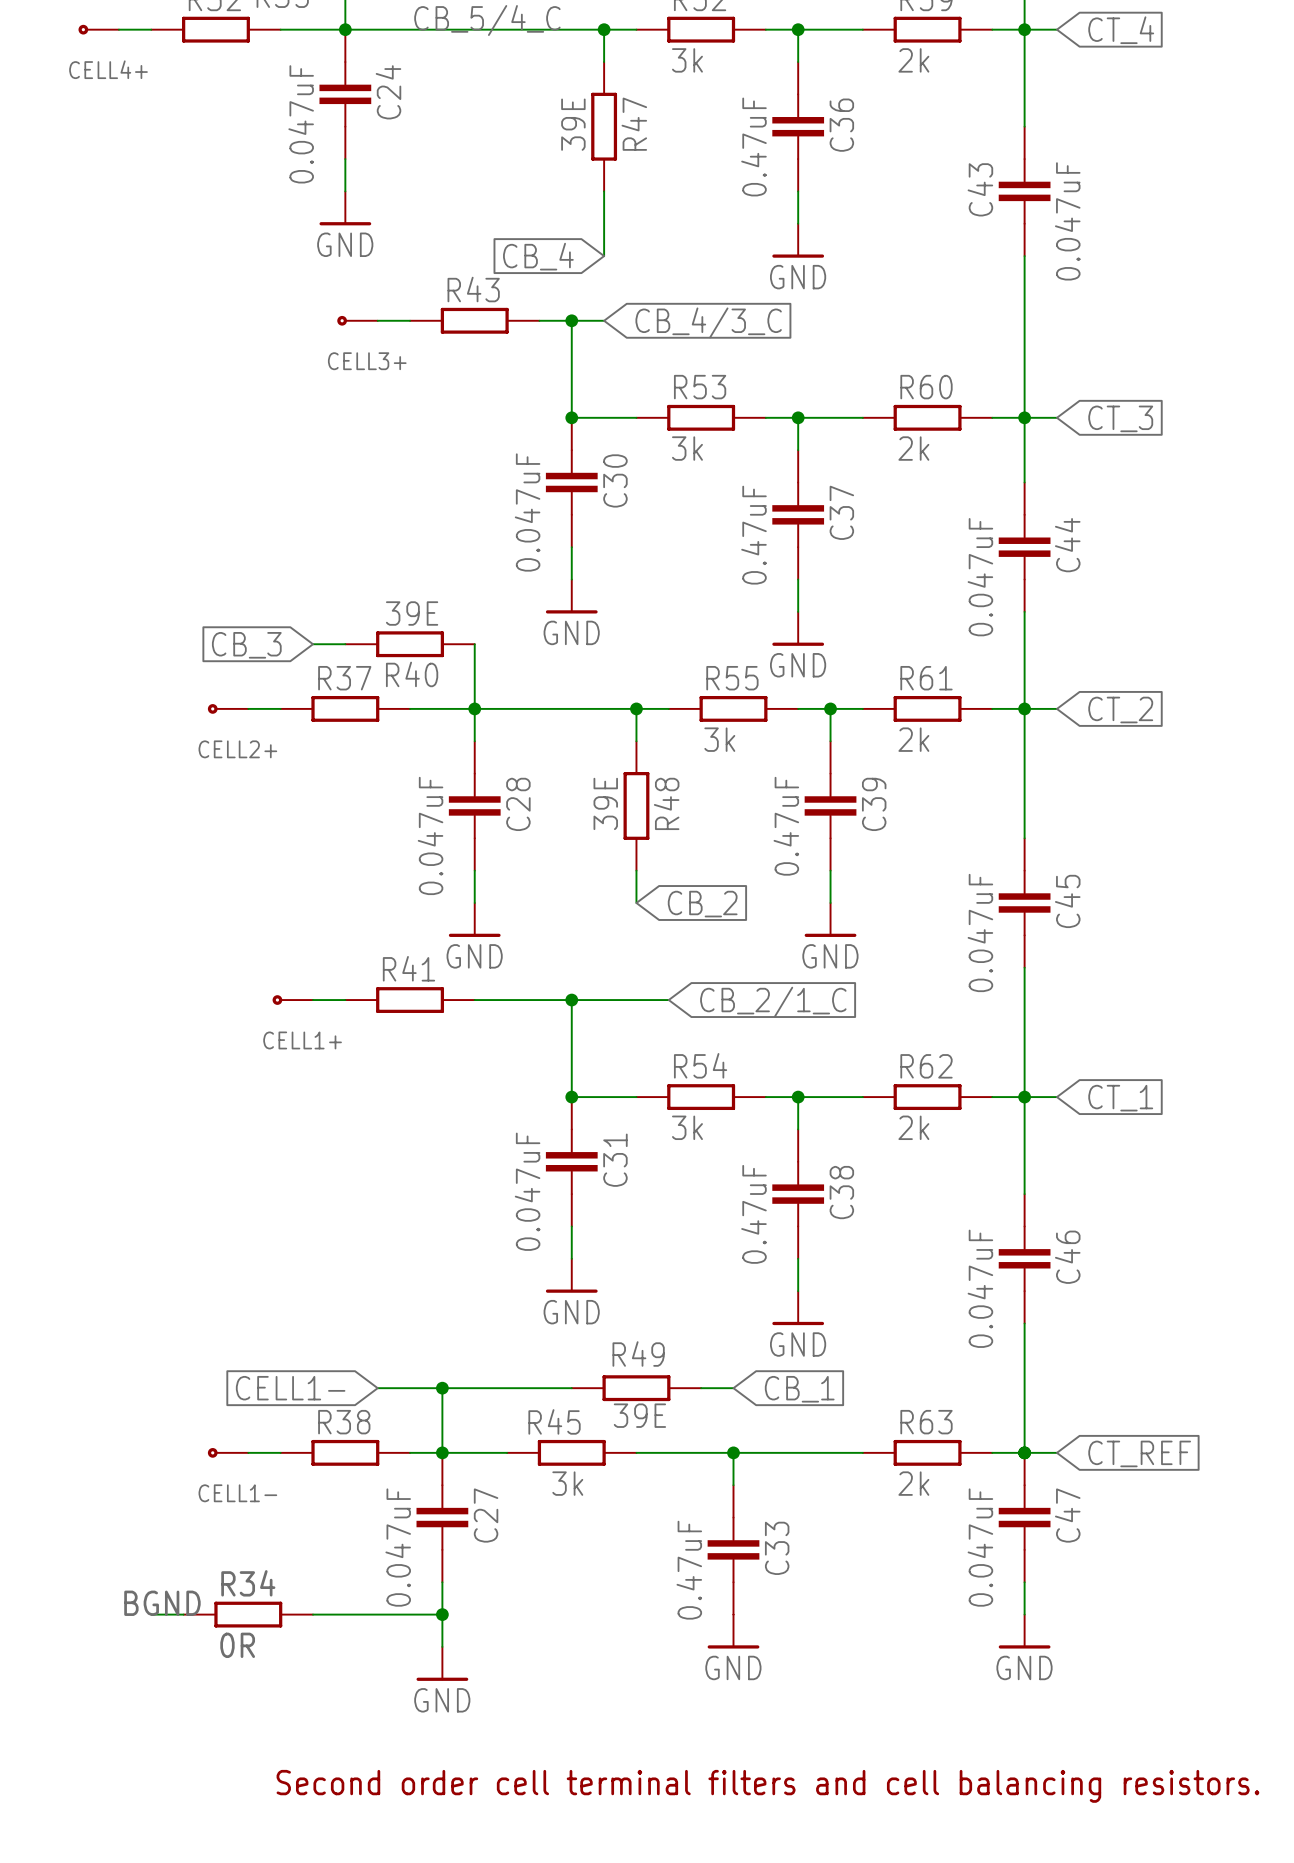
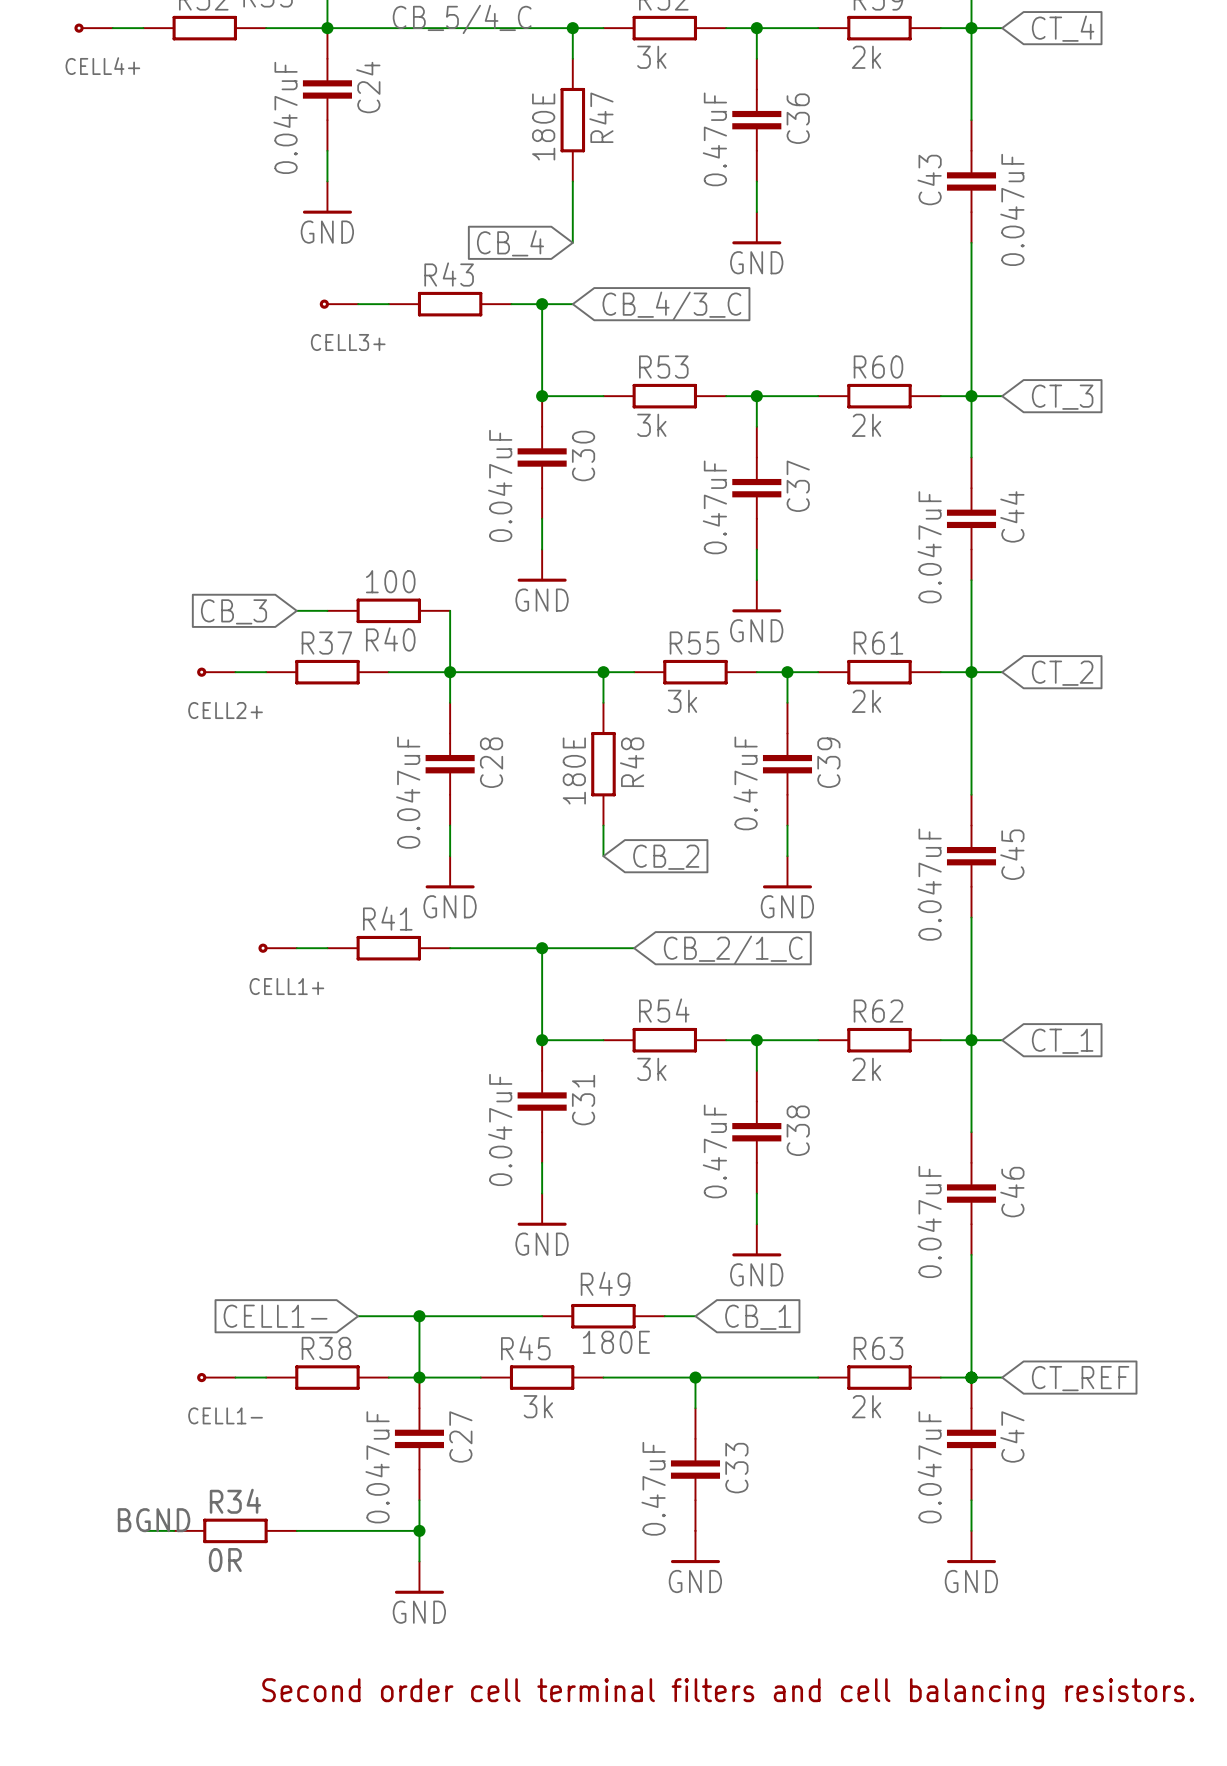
R47 value: 39E (573, 124) -> 180E (543, 126)
R40 value: 39E (412, 613) -> 100 (390, 581)
R48 value: 39E (605, 803) -> 180E (574, 770)
R49 value: 39E (639, 1415) -> 180E (616, 1342)

